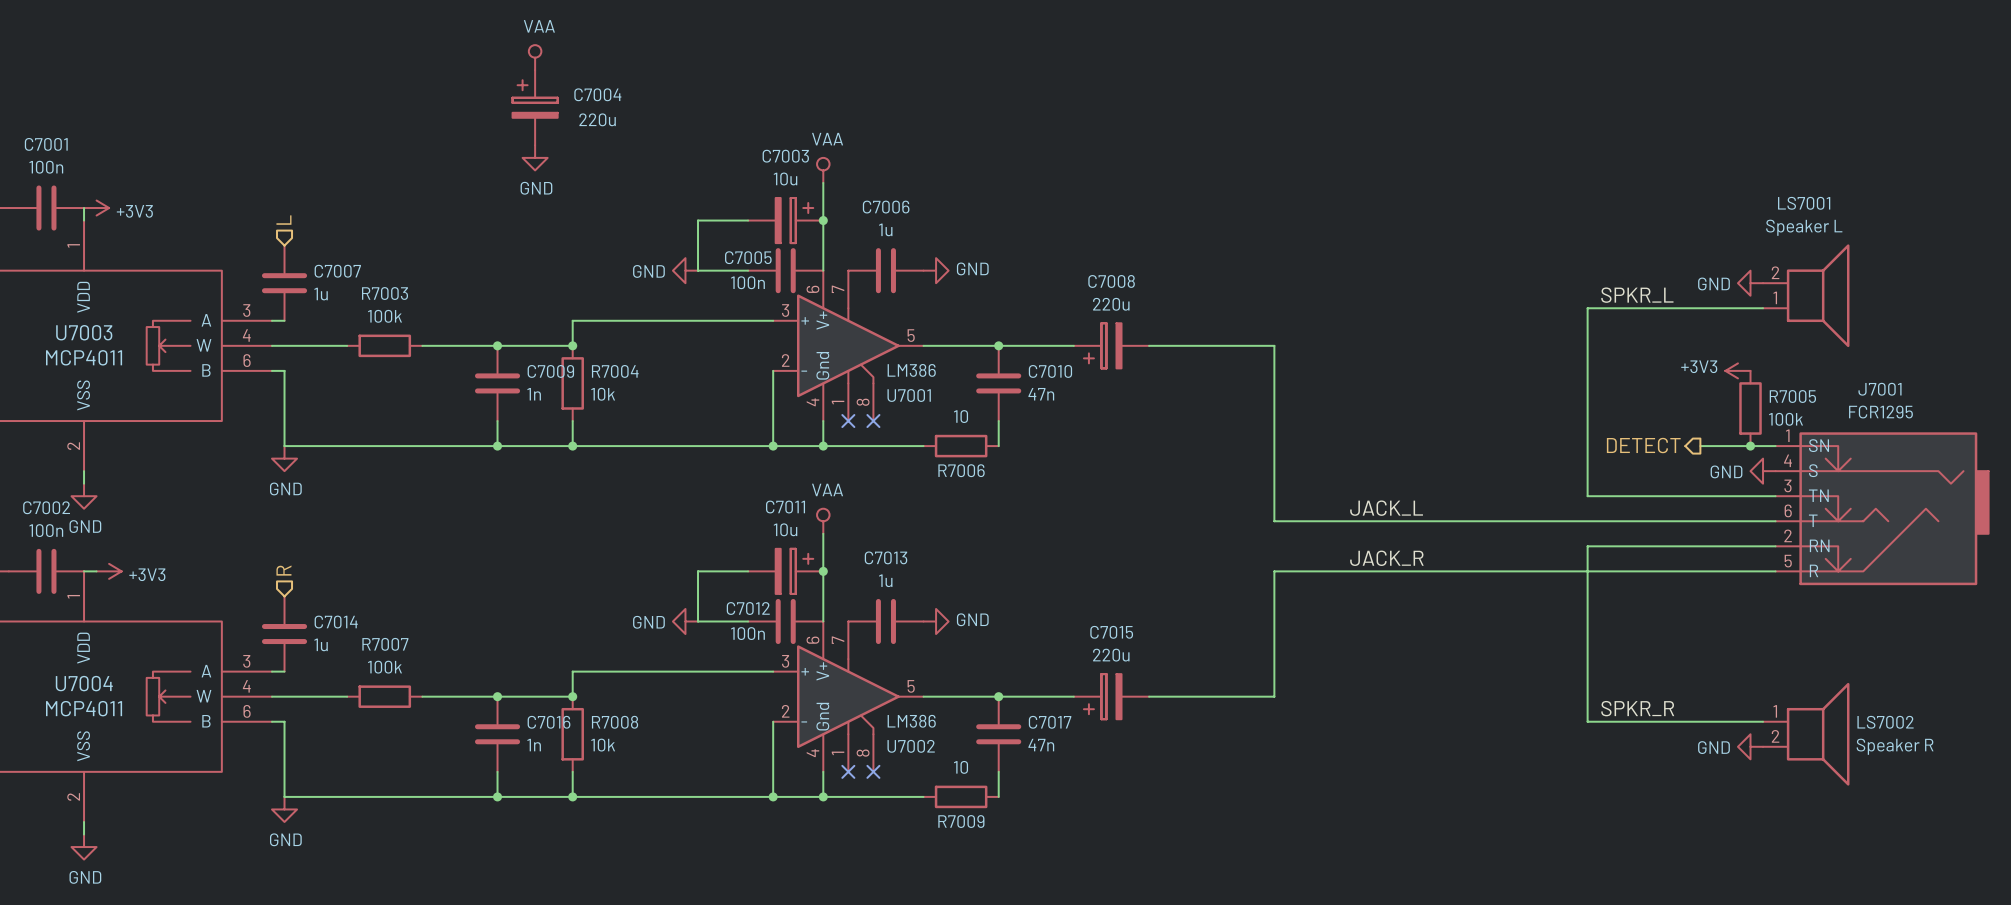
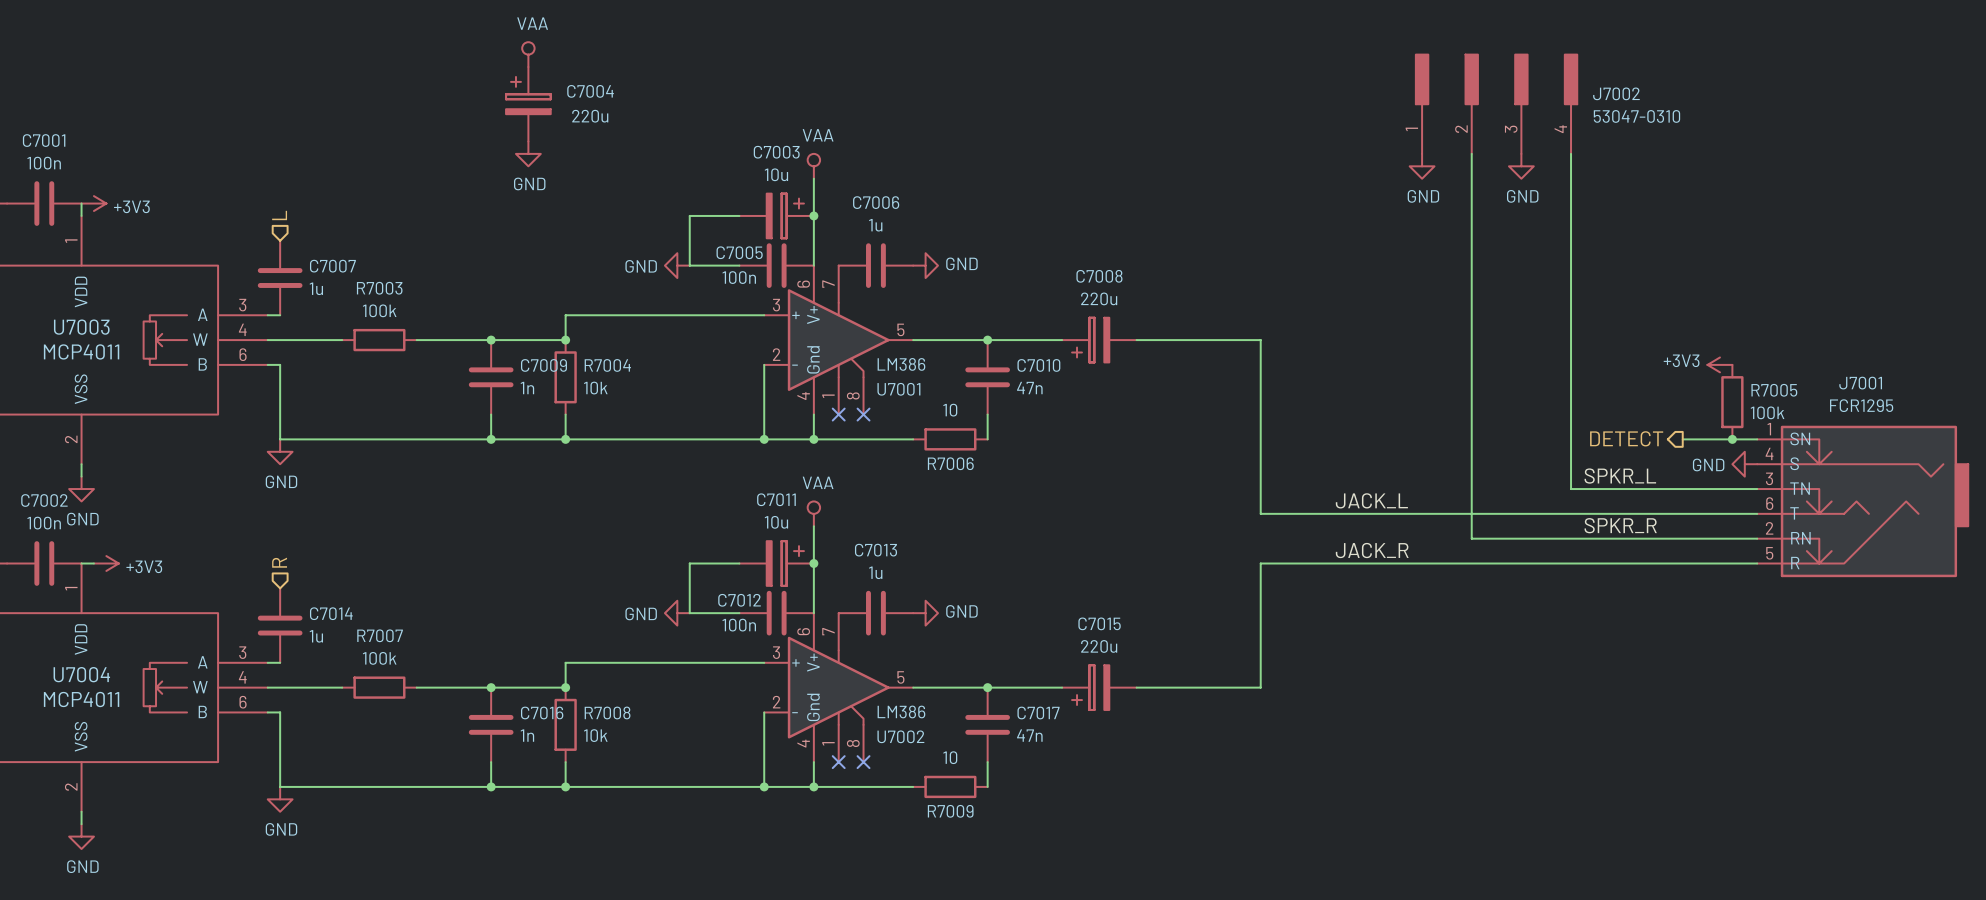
J7002: none -> 53047-0310 (1496, 104)
power symbol: none -> GND (1422, 166)
power symbol: none -> GND (1521, 166)
power symbol: GND (1750, 283) -> none
label position: SPKR_L (1637, 295) -> SPKR_L (1620, 476)
LS7001: Speaker L (1806, 295) -> none
wire: (1587, 308) (1763, 308) -> (1571, 302) (1571, 153)
wire: (1587, 546) (1587, 721) (1763, 721) -> (1571, 538) (1471, 538) (1471, 153)
label position: SPKR_R (1637, 708) -> SPKR_R (1620, 525)
LS7002: Speaker R (1806, 734) -> none
power symbol: GND (1750, 746) -> none

